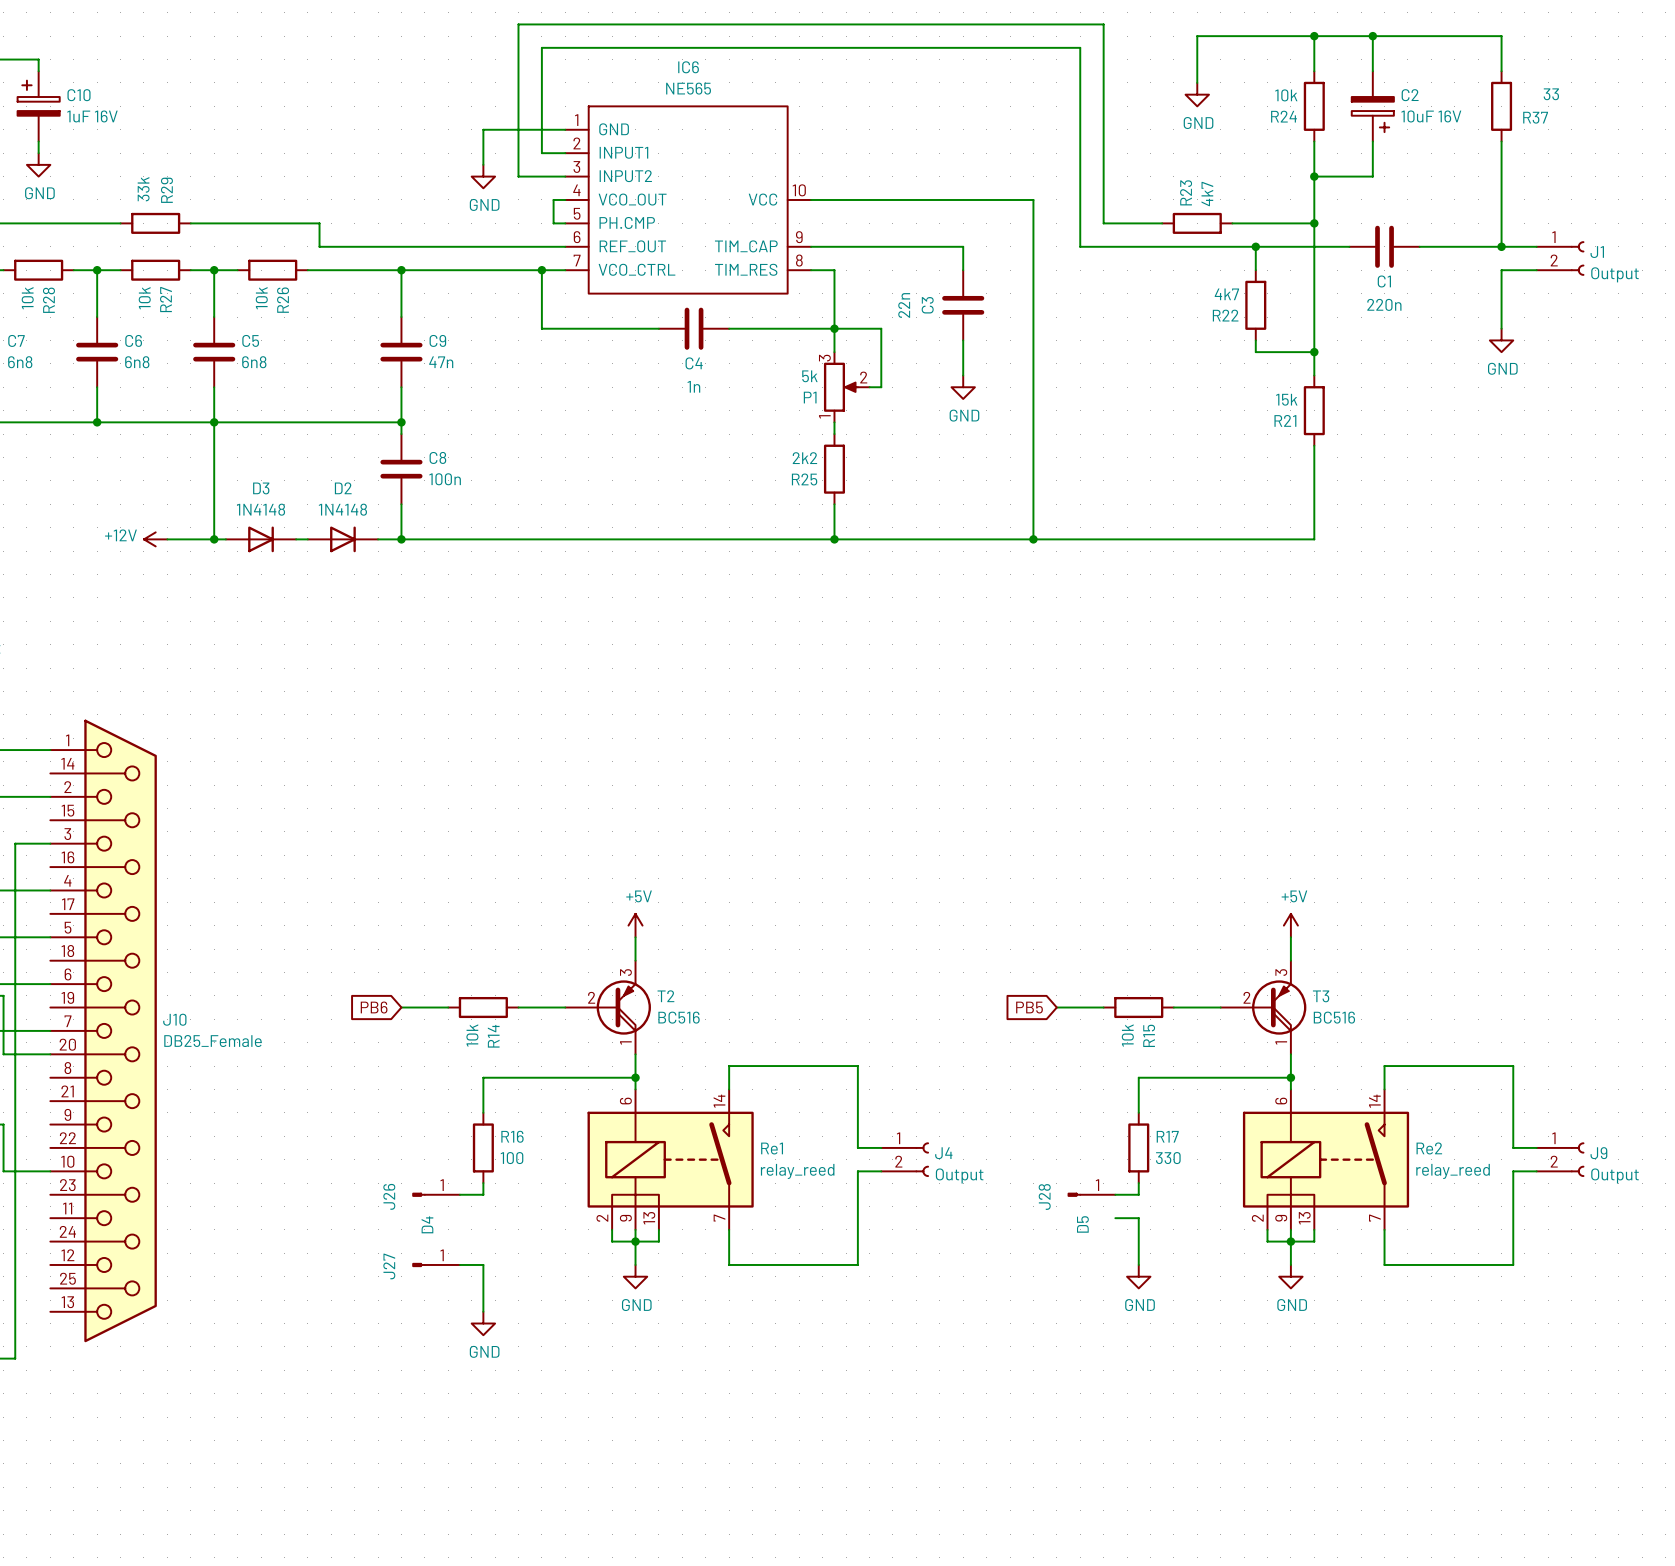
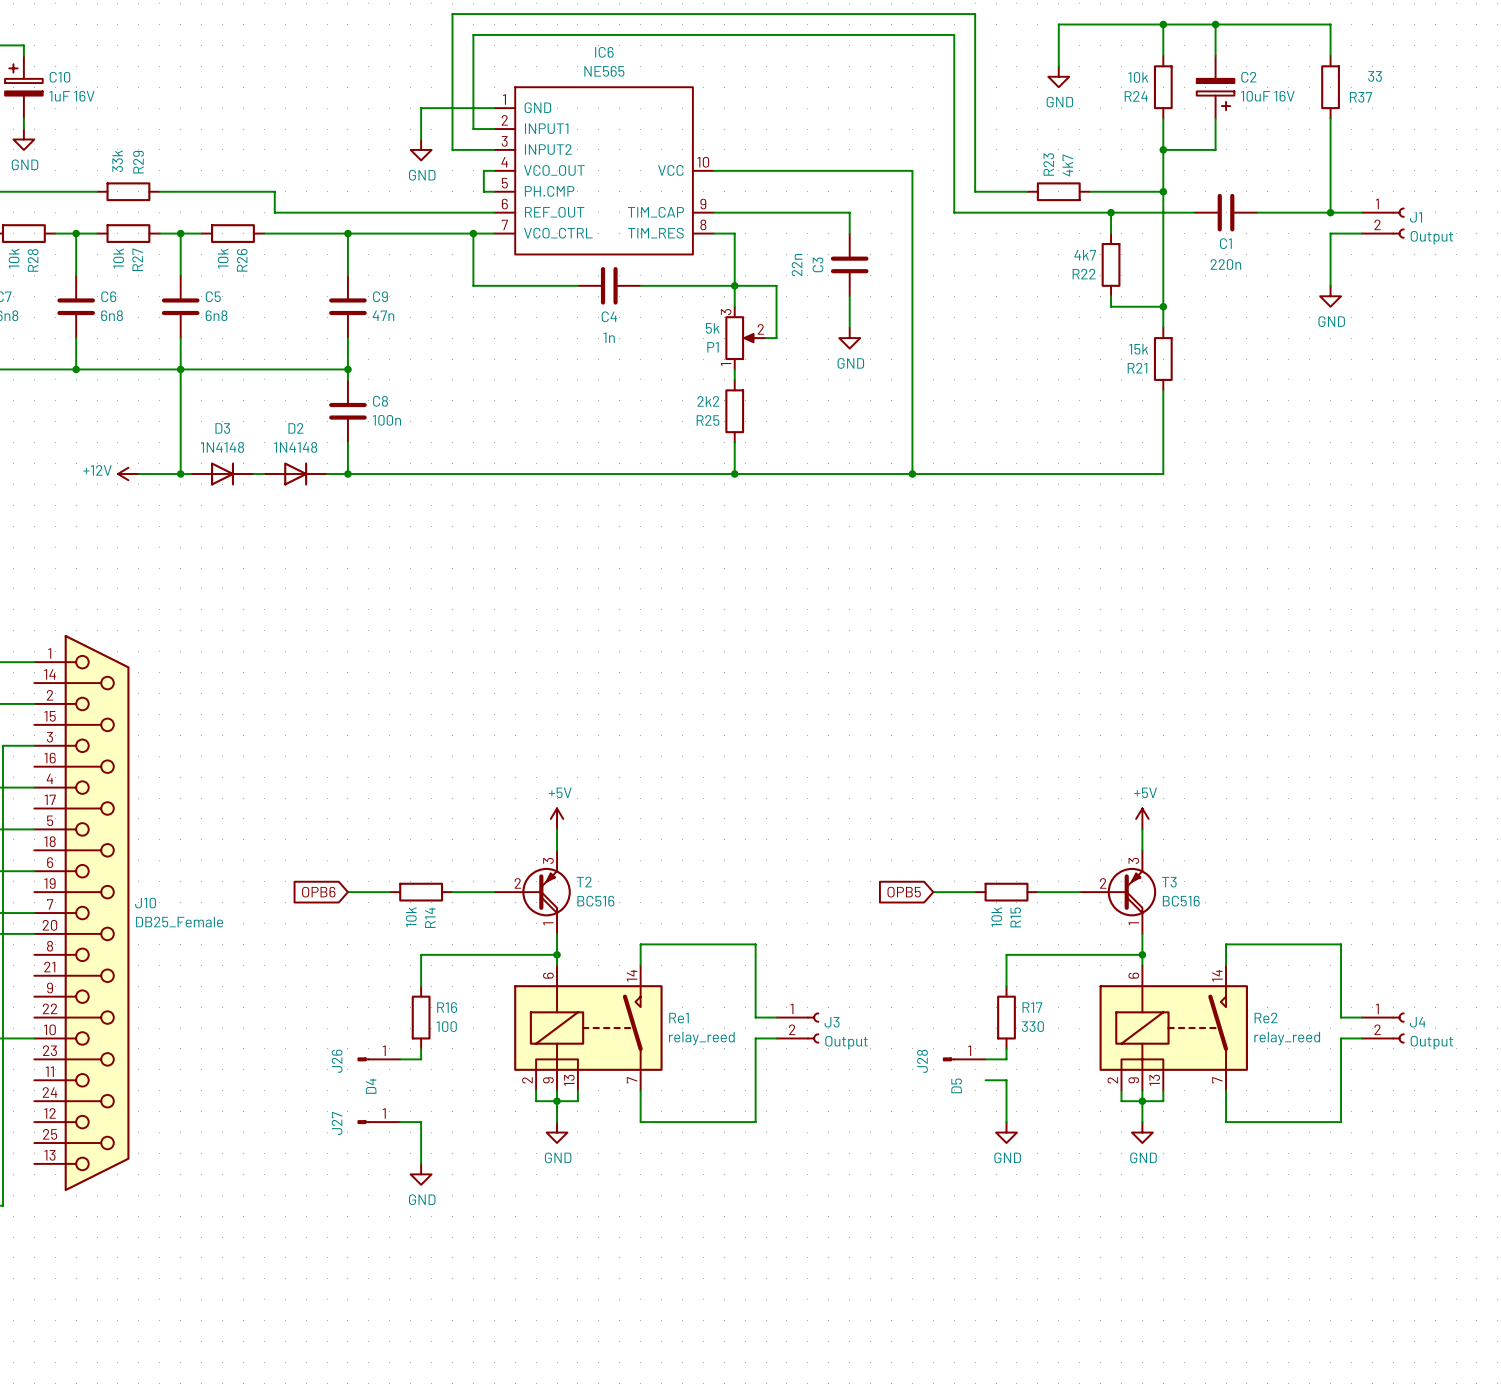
global label: PB6 (374, 1007) -> OPB6 (318, 892)
global label: PB5 (1029, 1007) -> OPB5 (904, 892)
J4 name: J4 (943, 1153) -> J3 (832, 1022)
J9 name: J9 (1598, 1153) -> J4 (1417, 1022)

